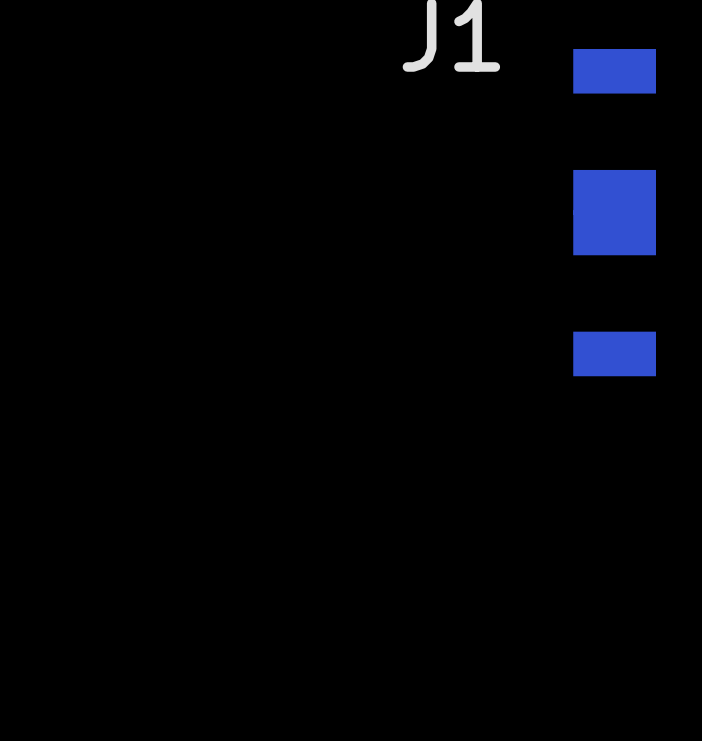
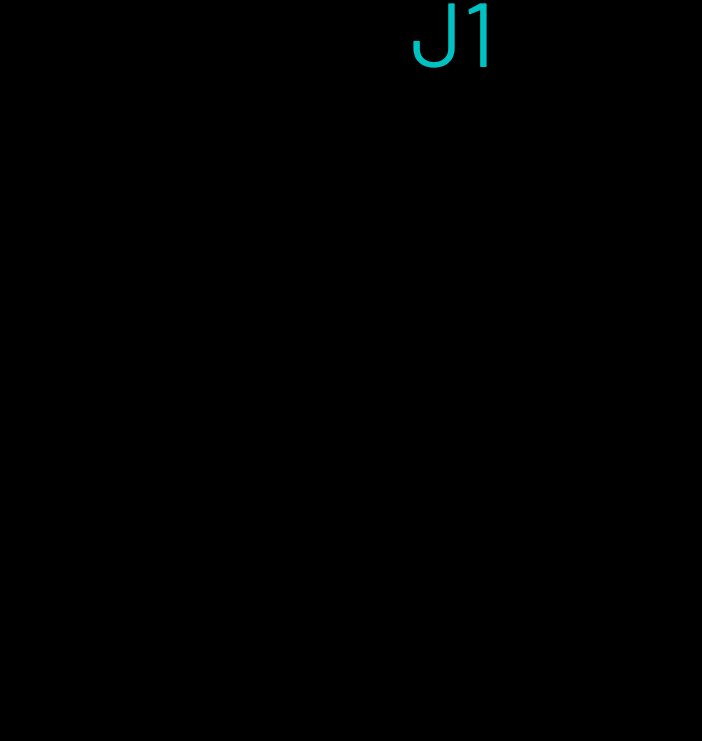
part: (614, 131) -> none
part: (614, 293) -> none

